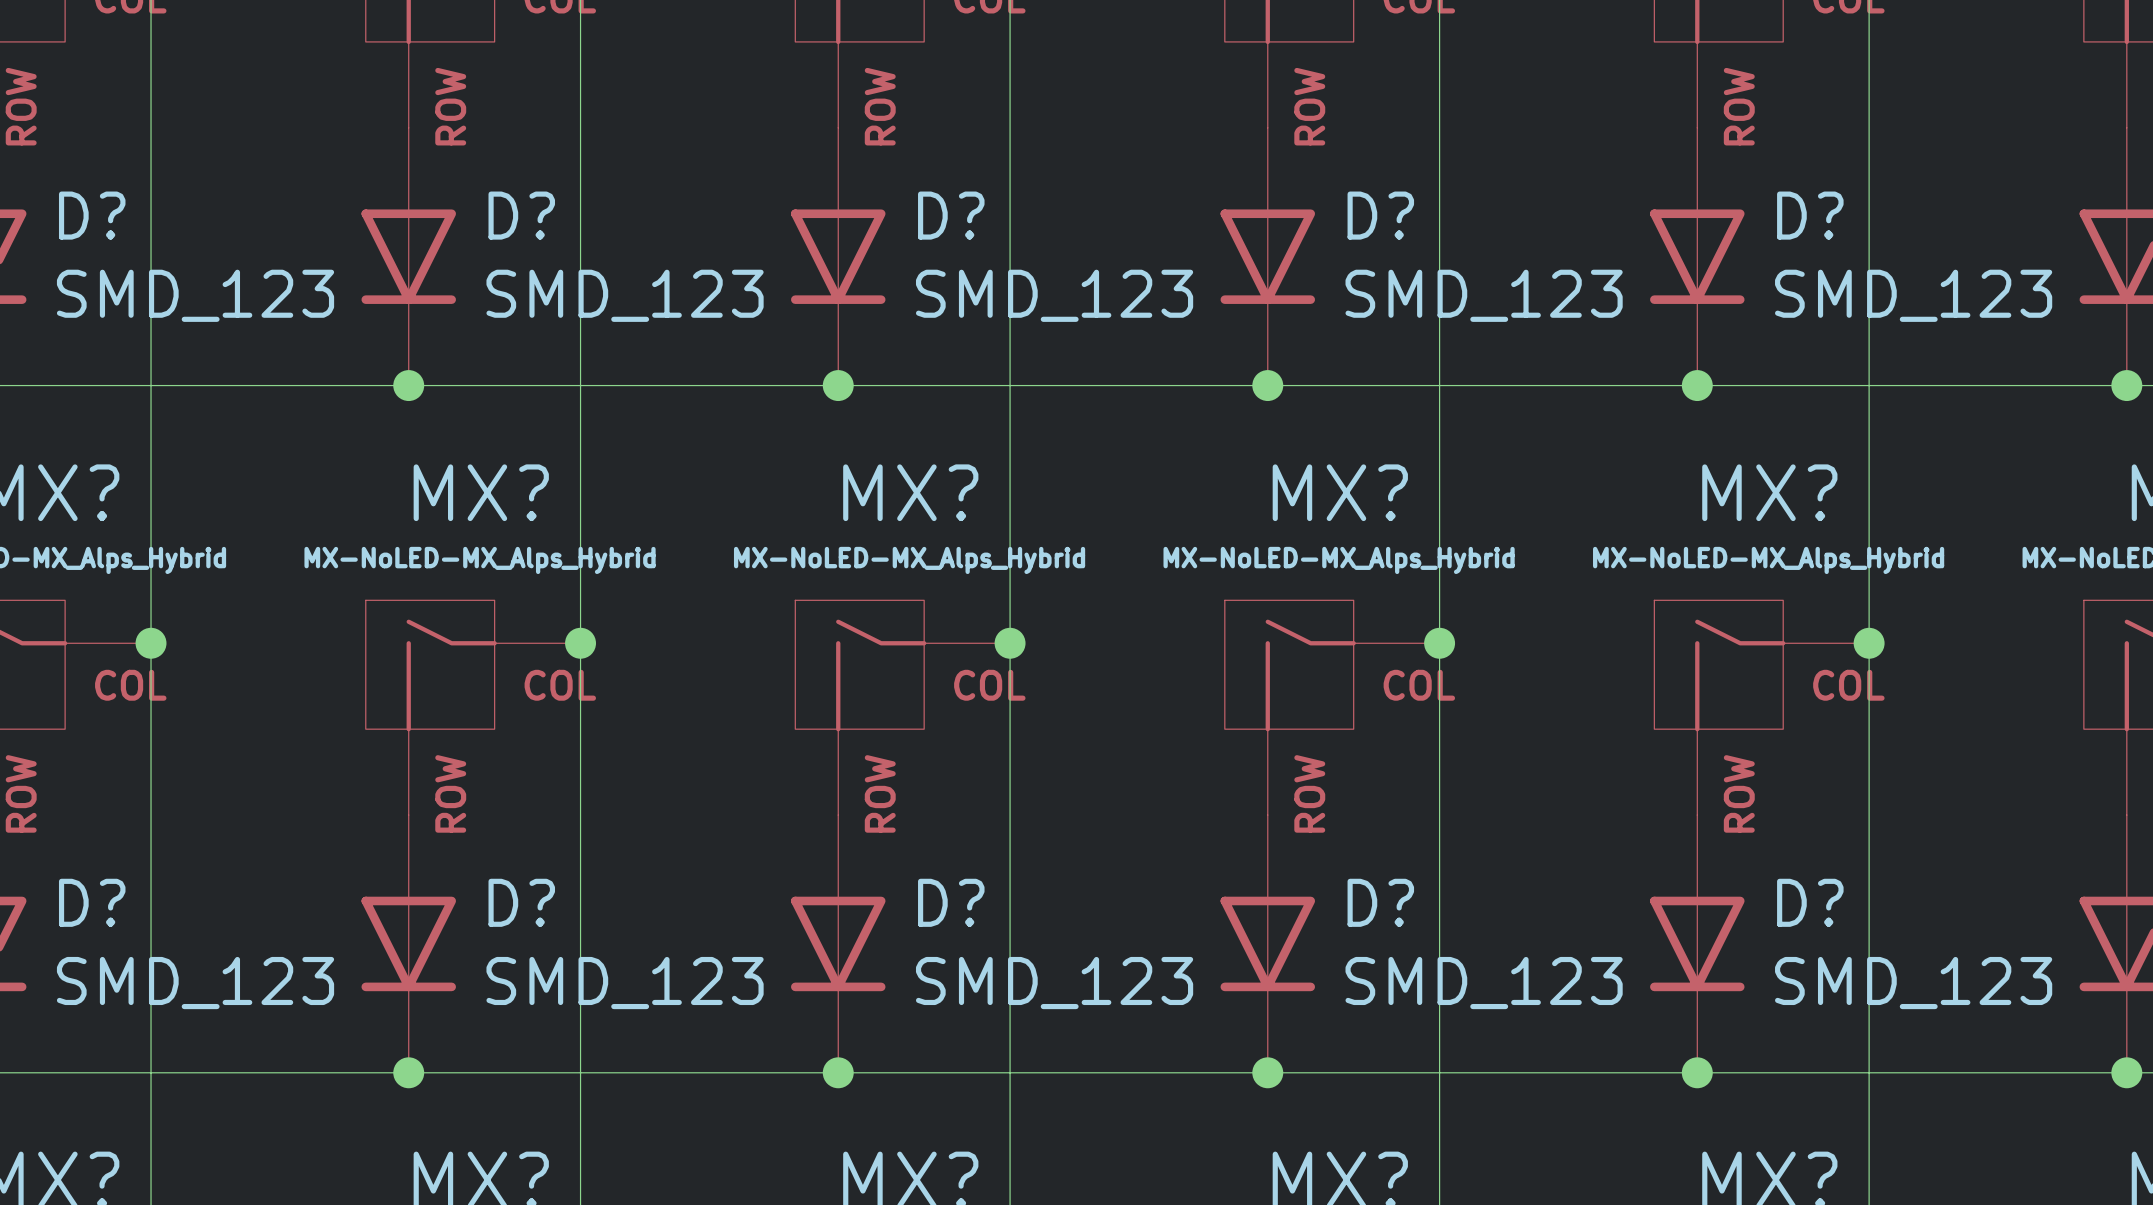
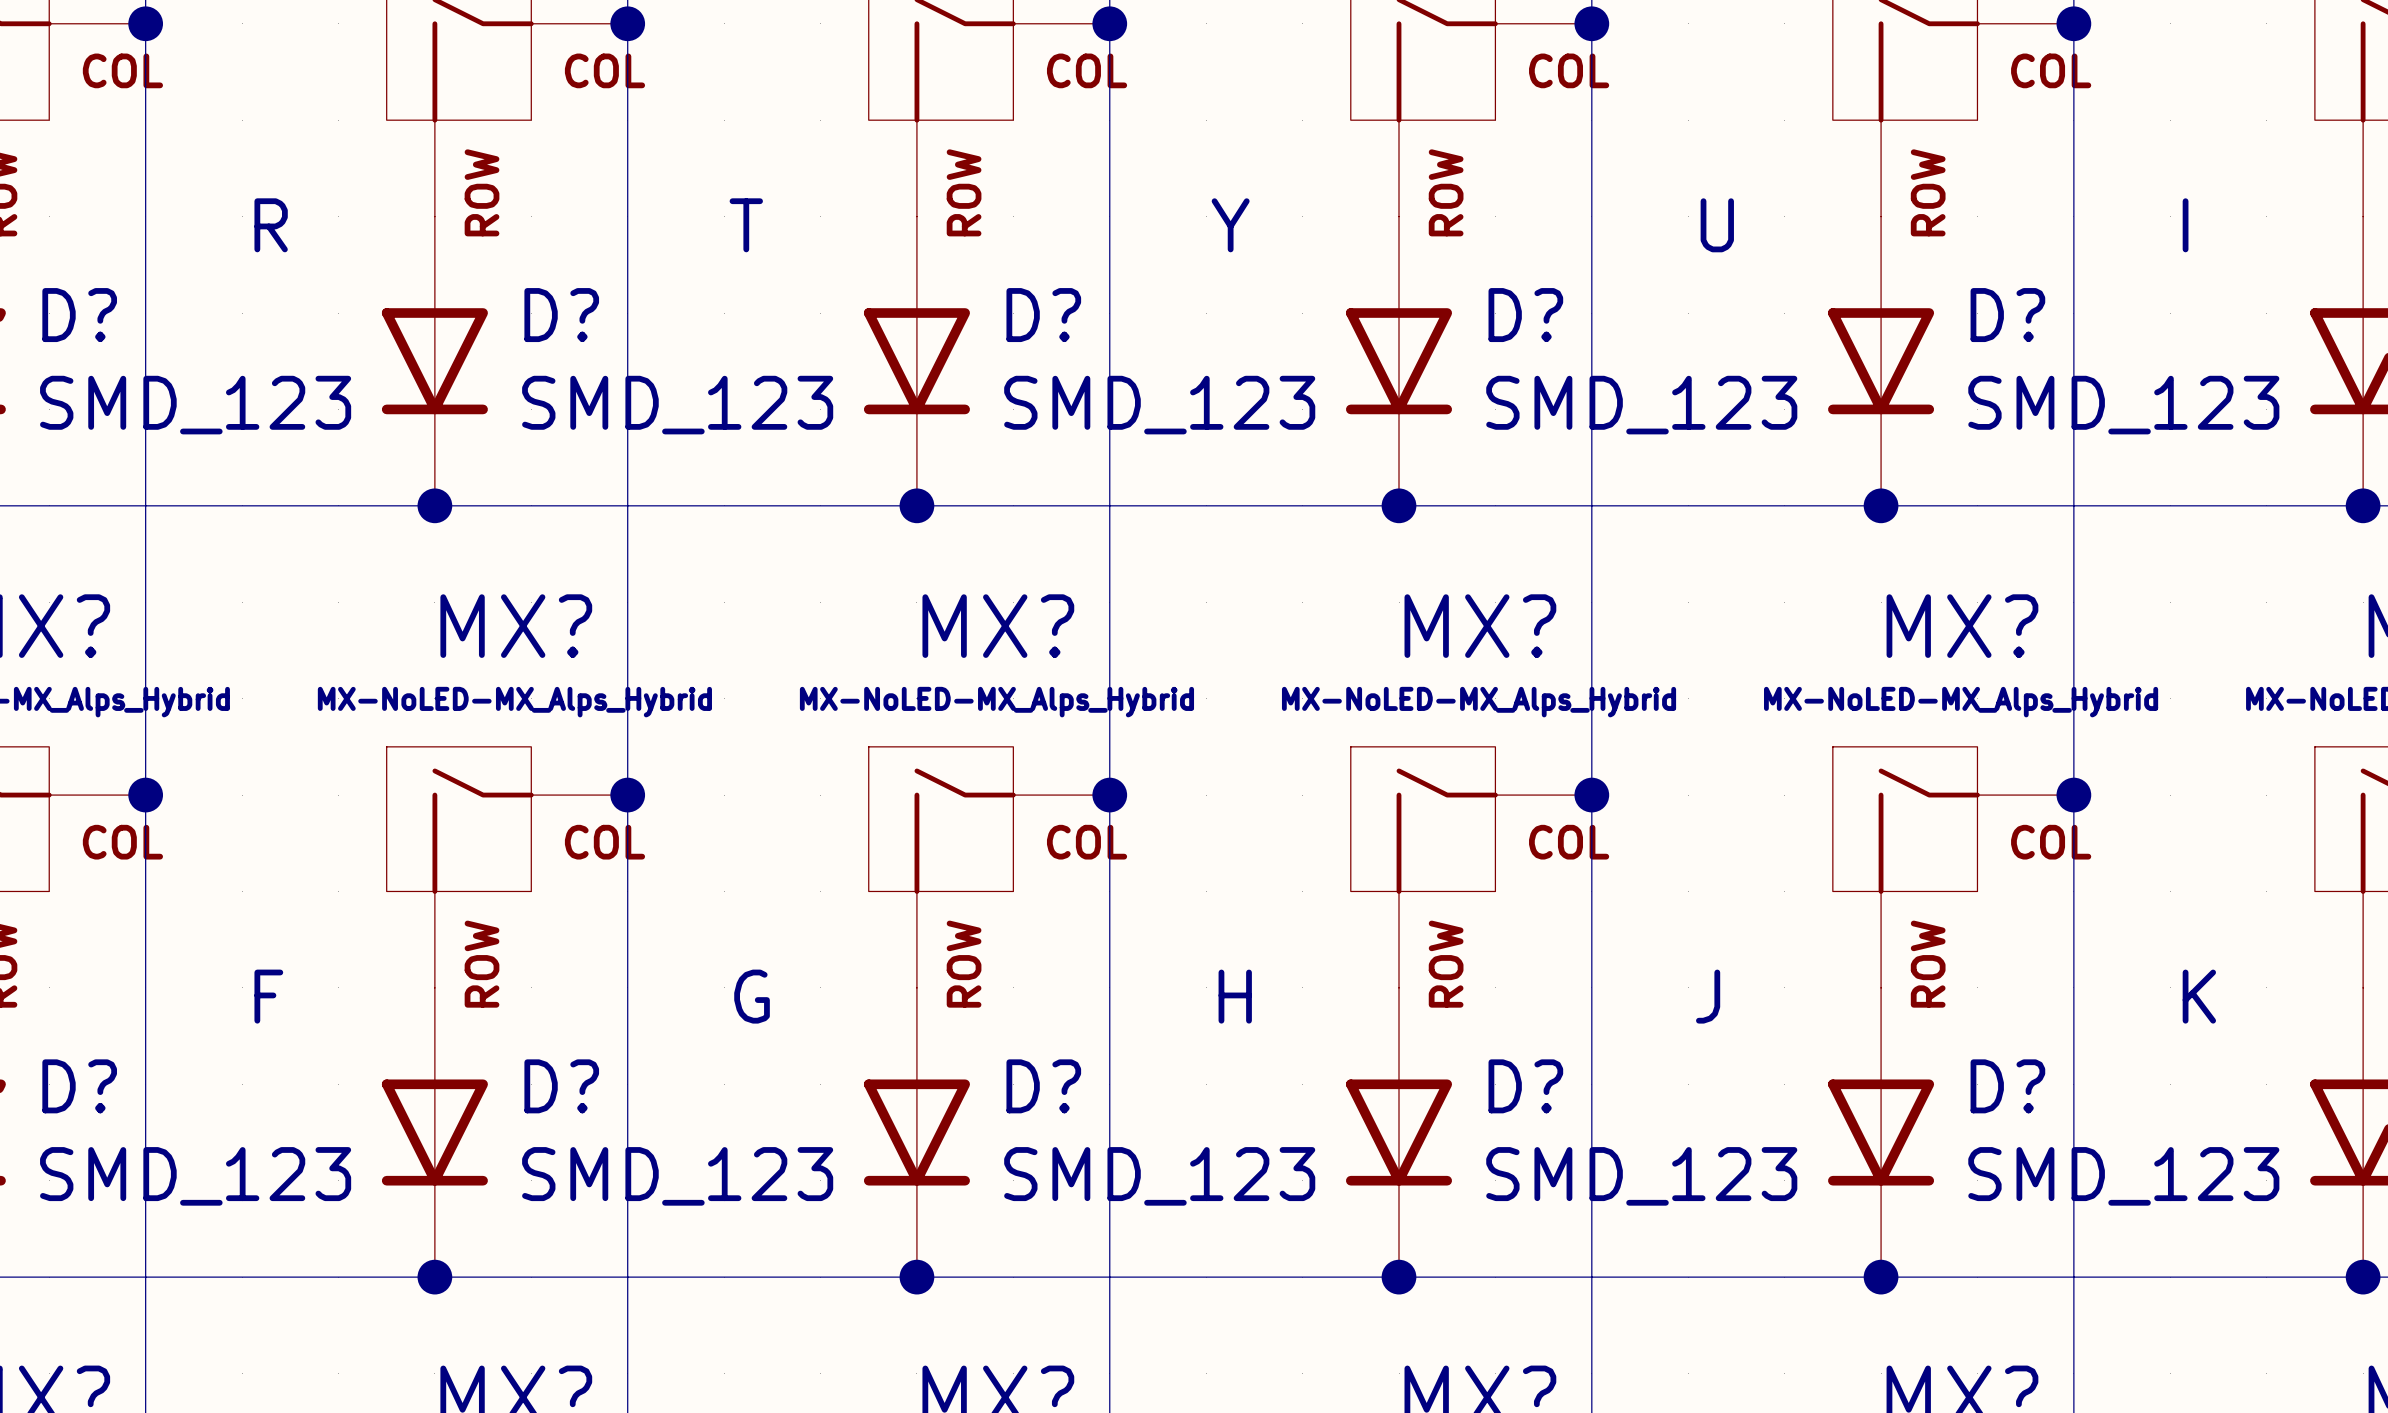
text: none -> R (271, 225)
text: none -> T (746, 225)
text: none -> Y (1230, 225)
text: none -> U (1717, 225)
text: none -> I (2185, 225)
text: none -> F (268, 996)
text: none -> G (752, 996)
text: none -> H (1235, 996)
text: none -> J (1708, 996)
text: none -> K (2199, 996)

